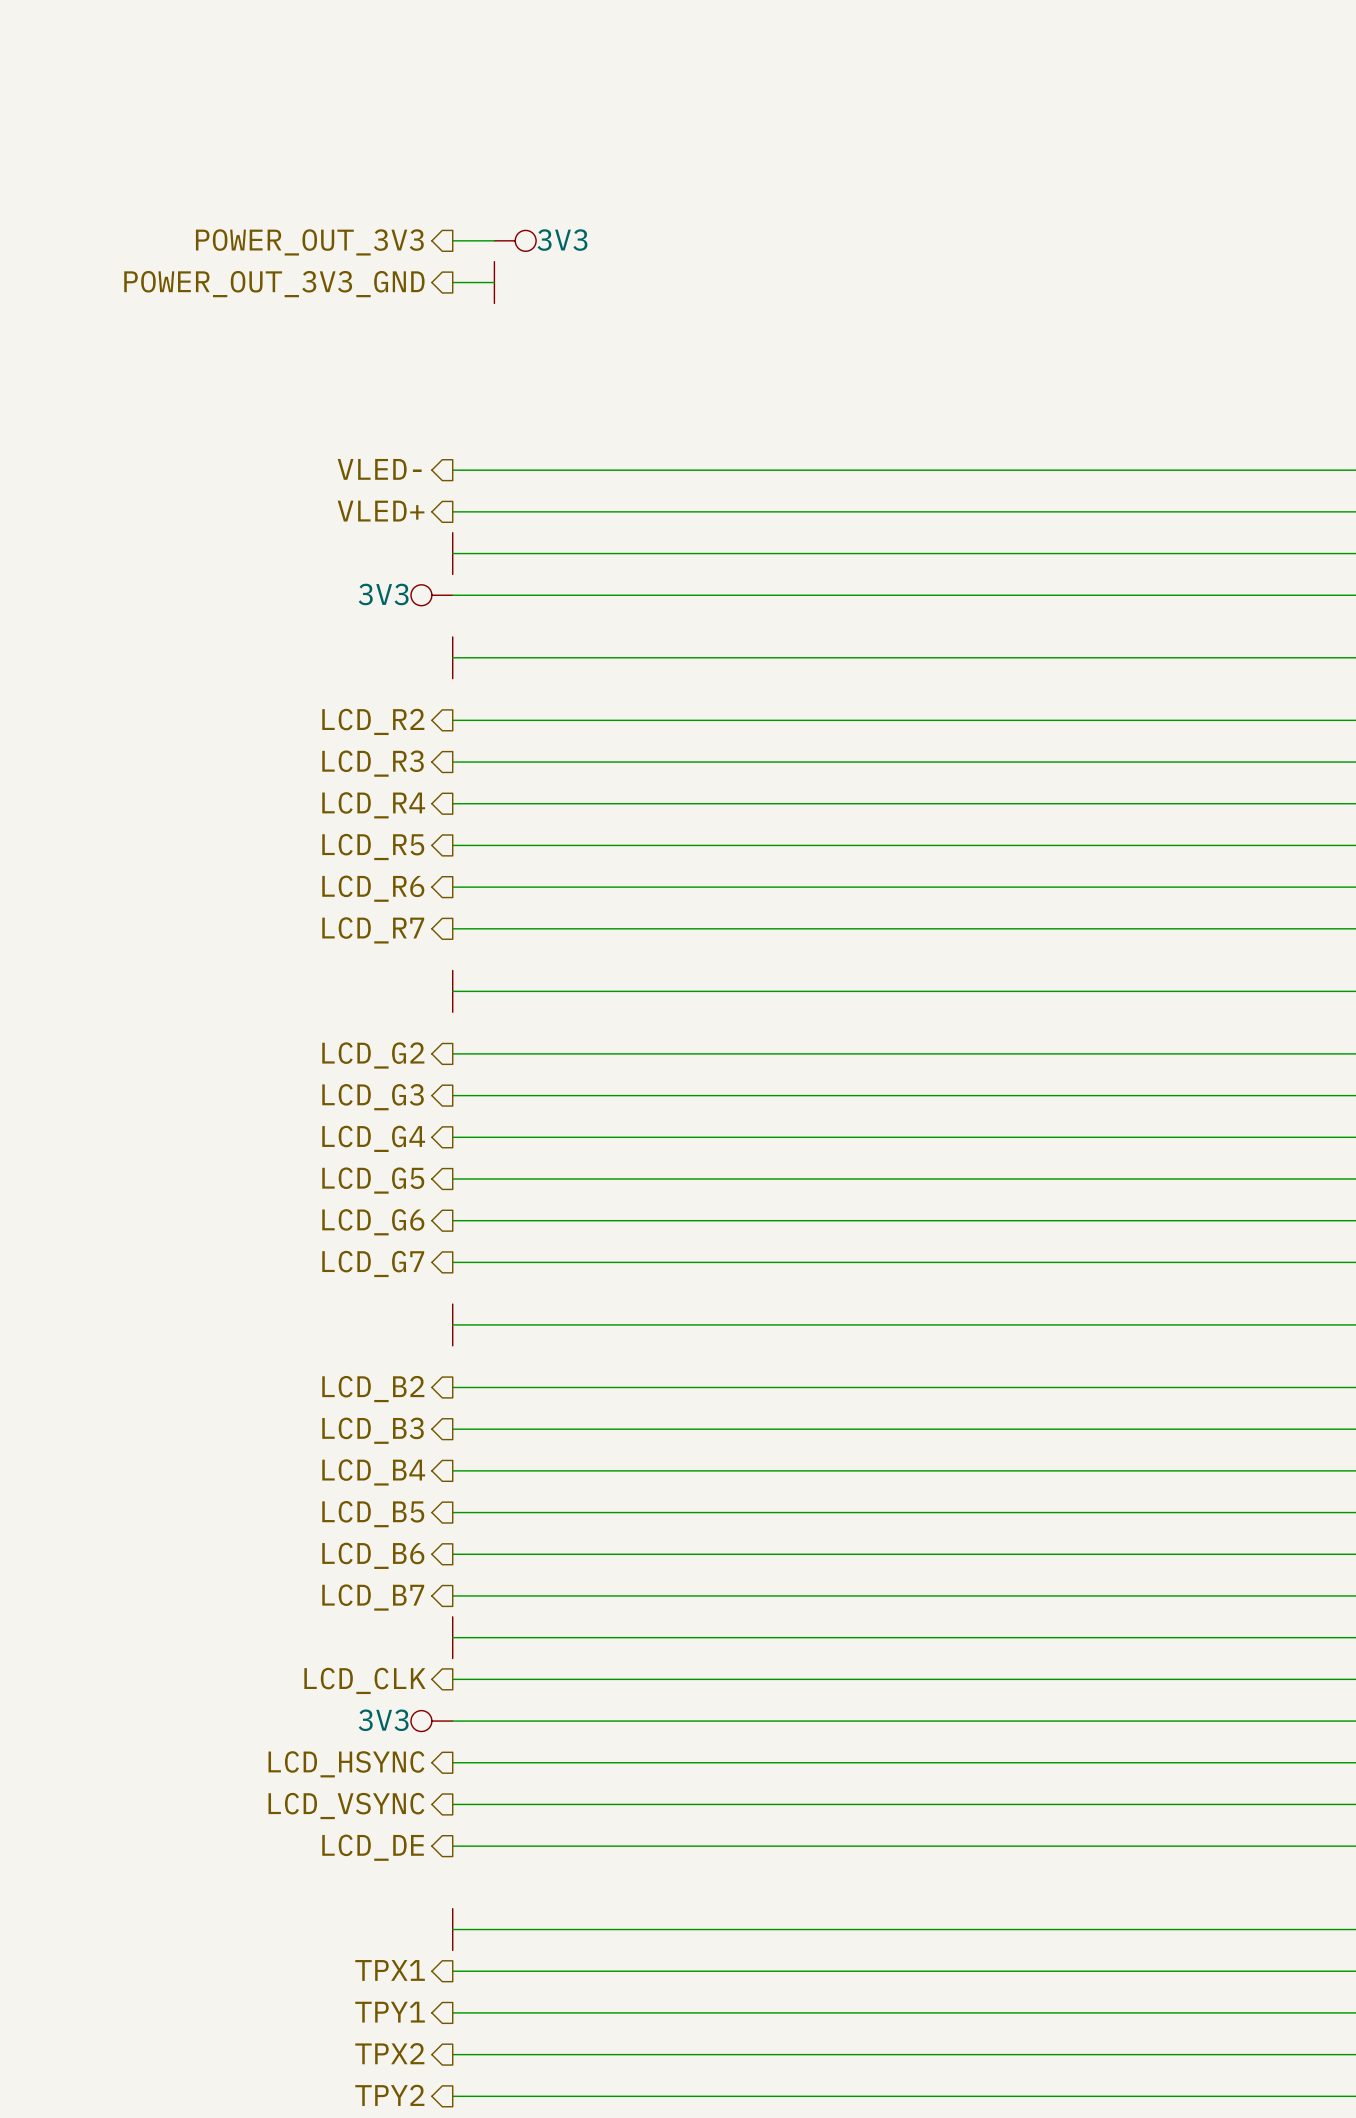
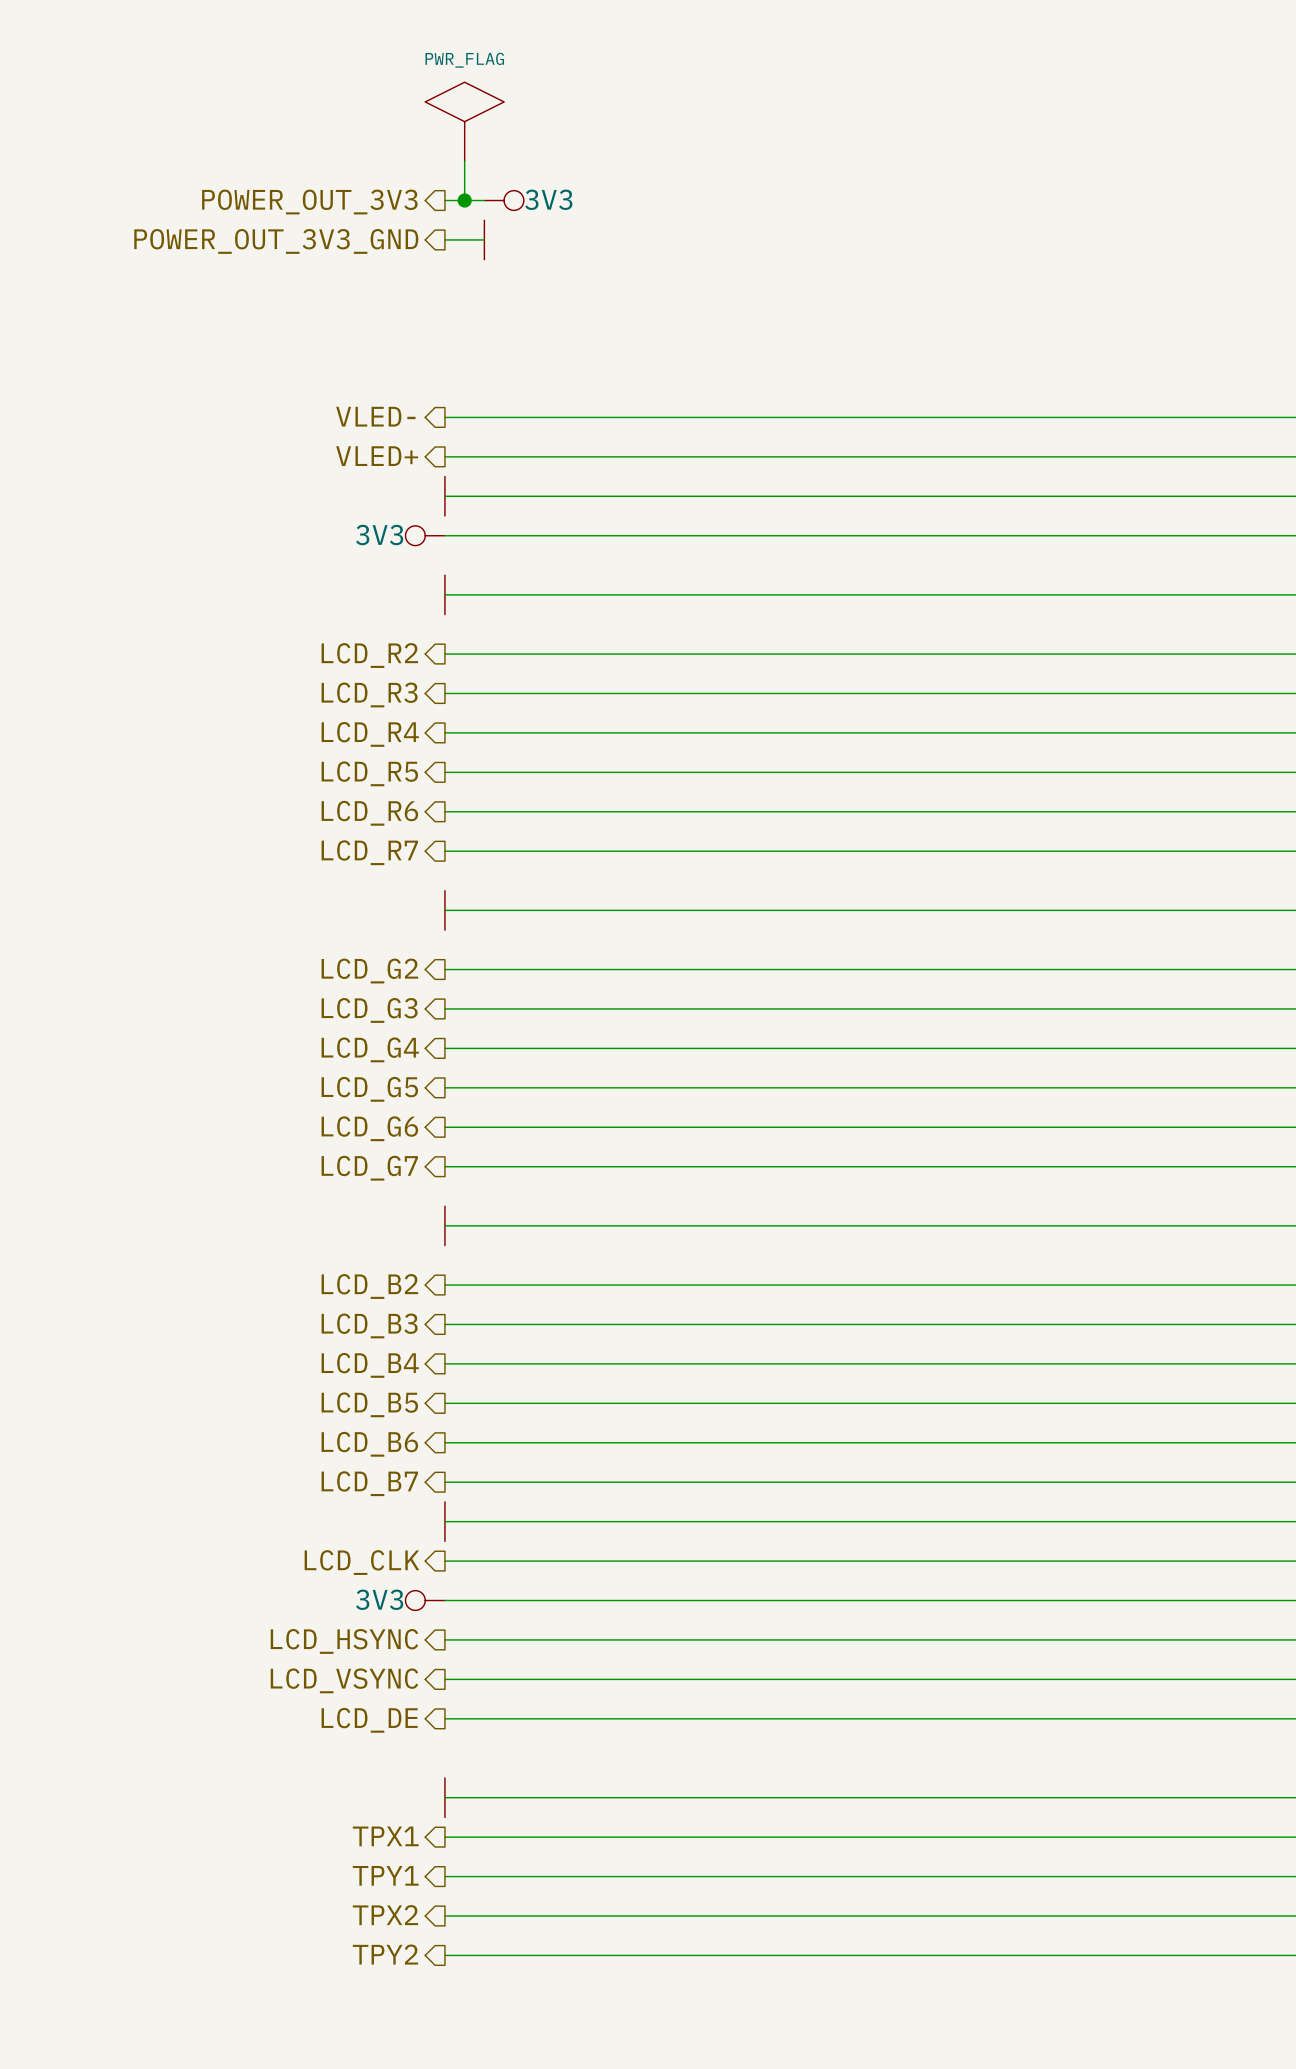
power symbol: none -> PWR_FLAG (464, 121)
wire: none -> (464, 161) (464, 200)
junction: none -> (464, 200)

